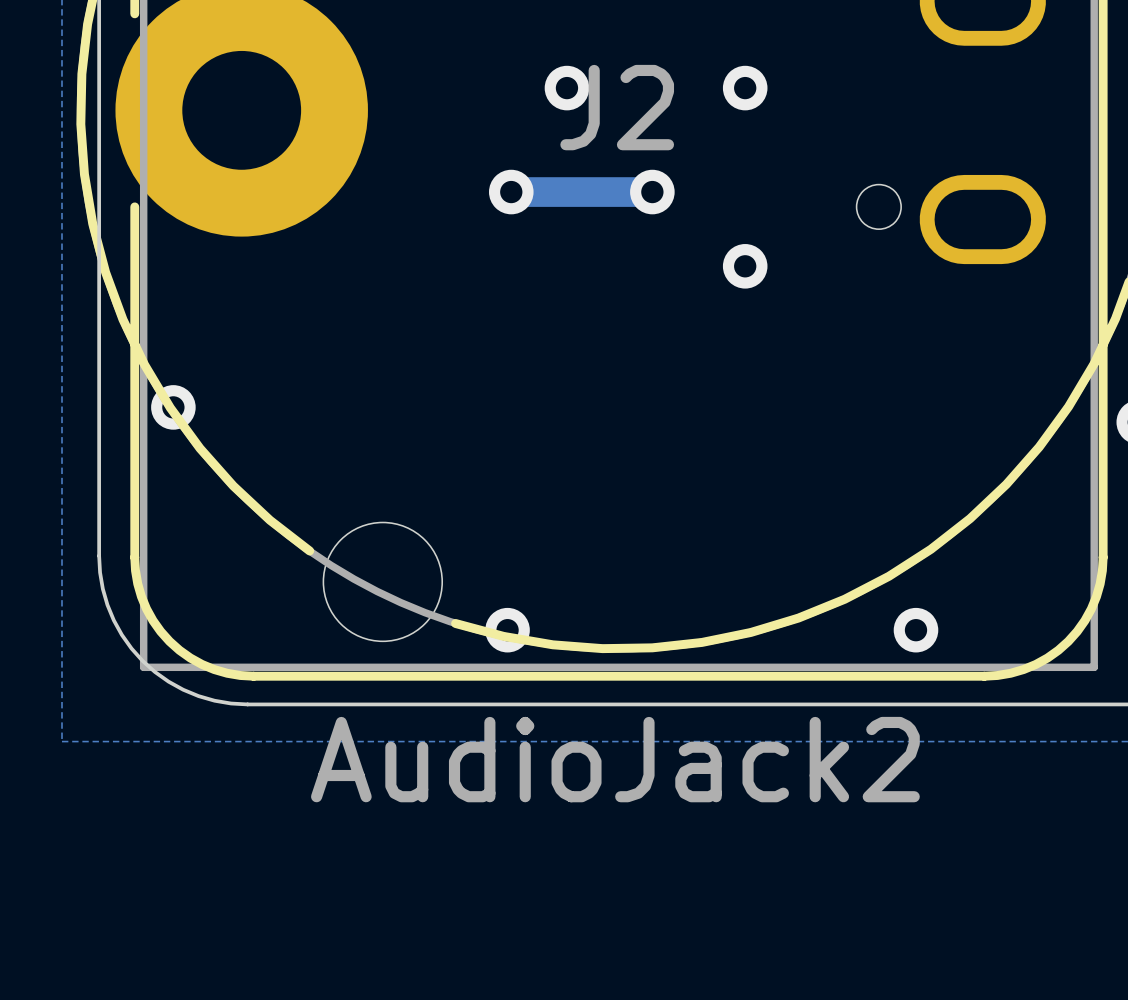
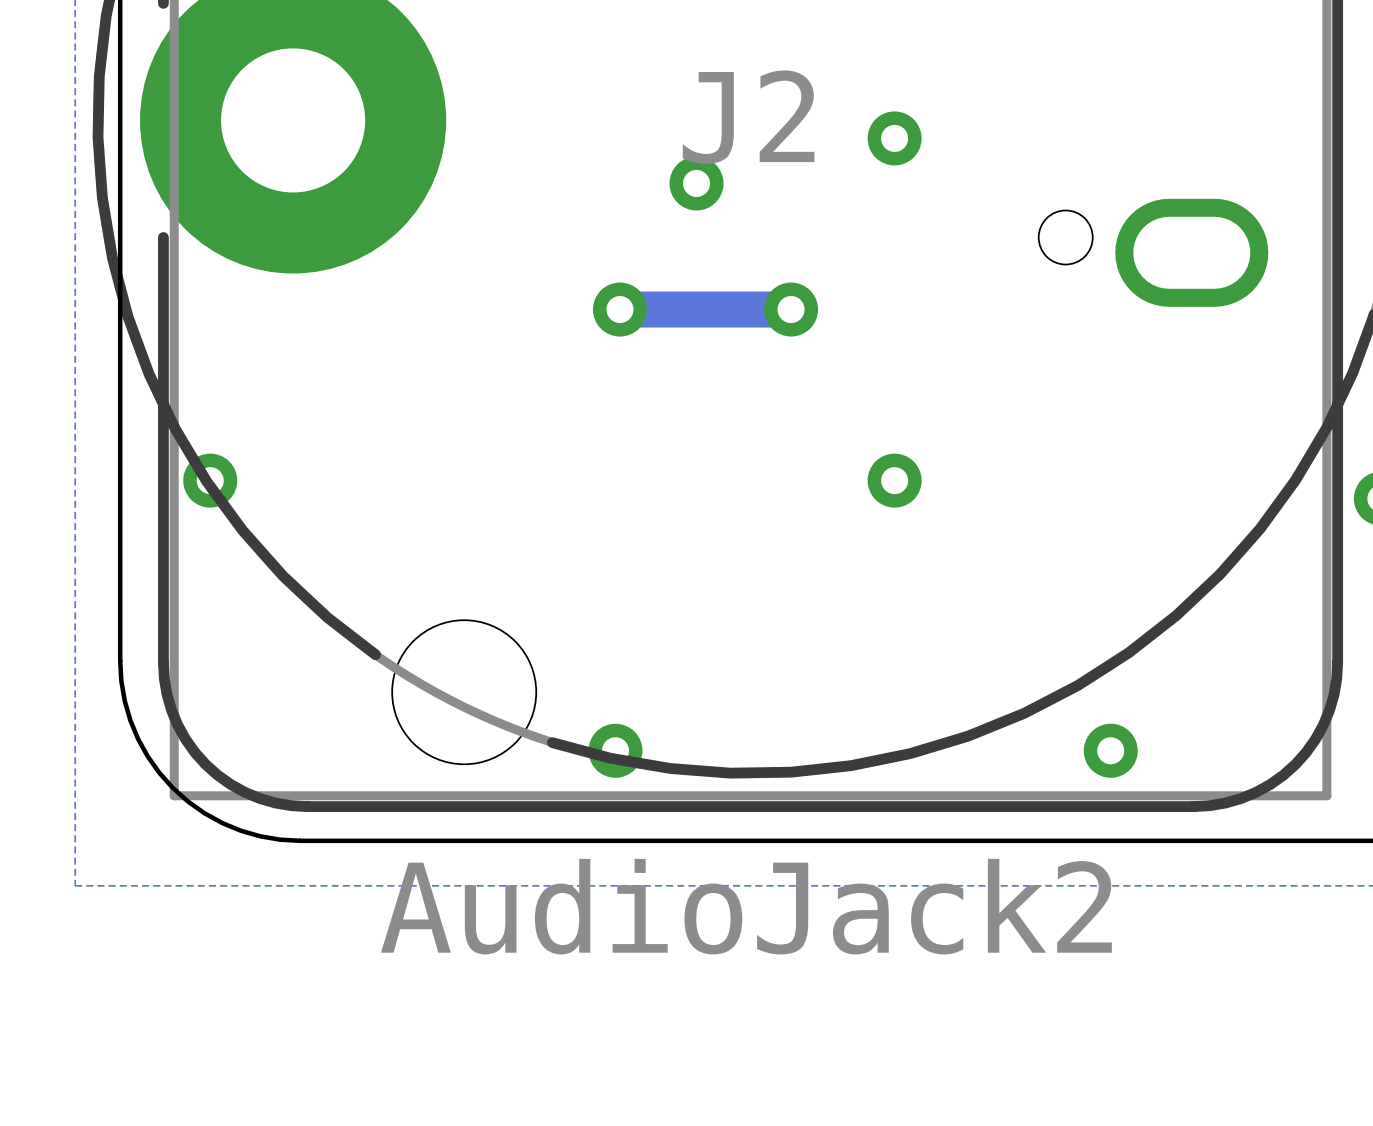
via: (566, 88) -> none
via position: (745, 88) -> (894, 138)
via: none -> (696, 183)
via: (511, 192) -> none
track: (652, 192) (511, 192) -> (791, 309) (619, 309)
via: (652, 192) -> none
via: none -> (619, 309)
via: none -> (791, 309)
via: (745, 266) -> none
via: none -> (894, 480)

